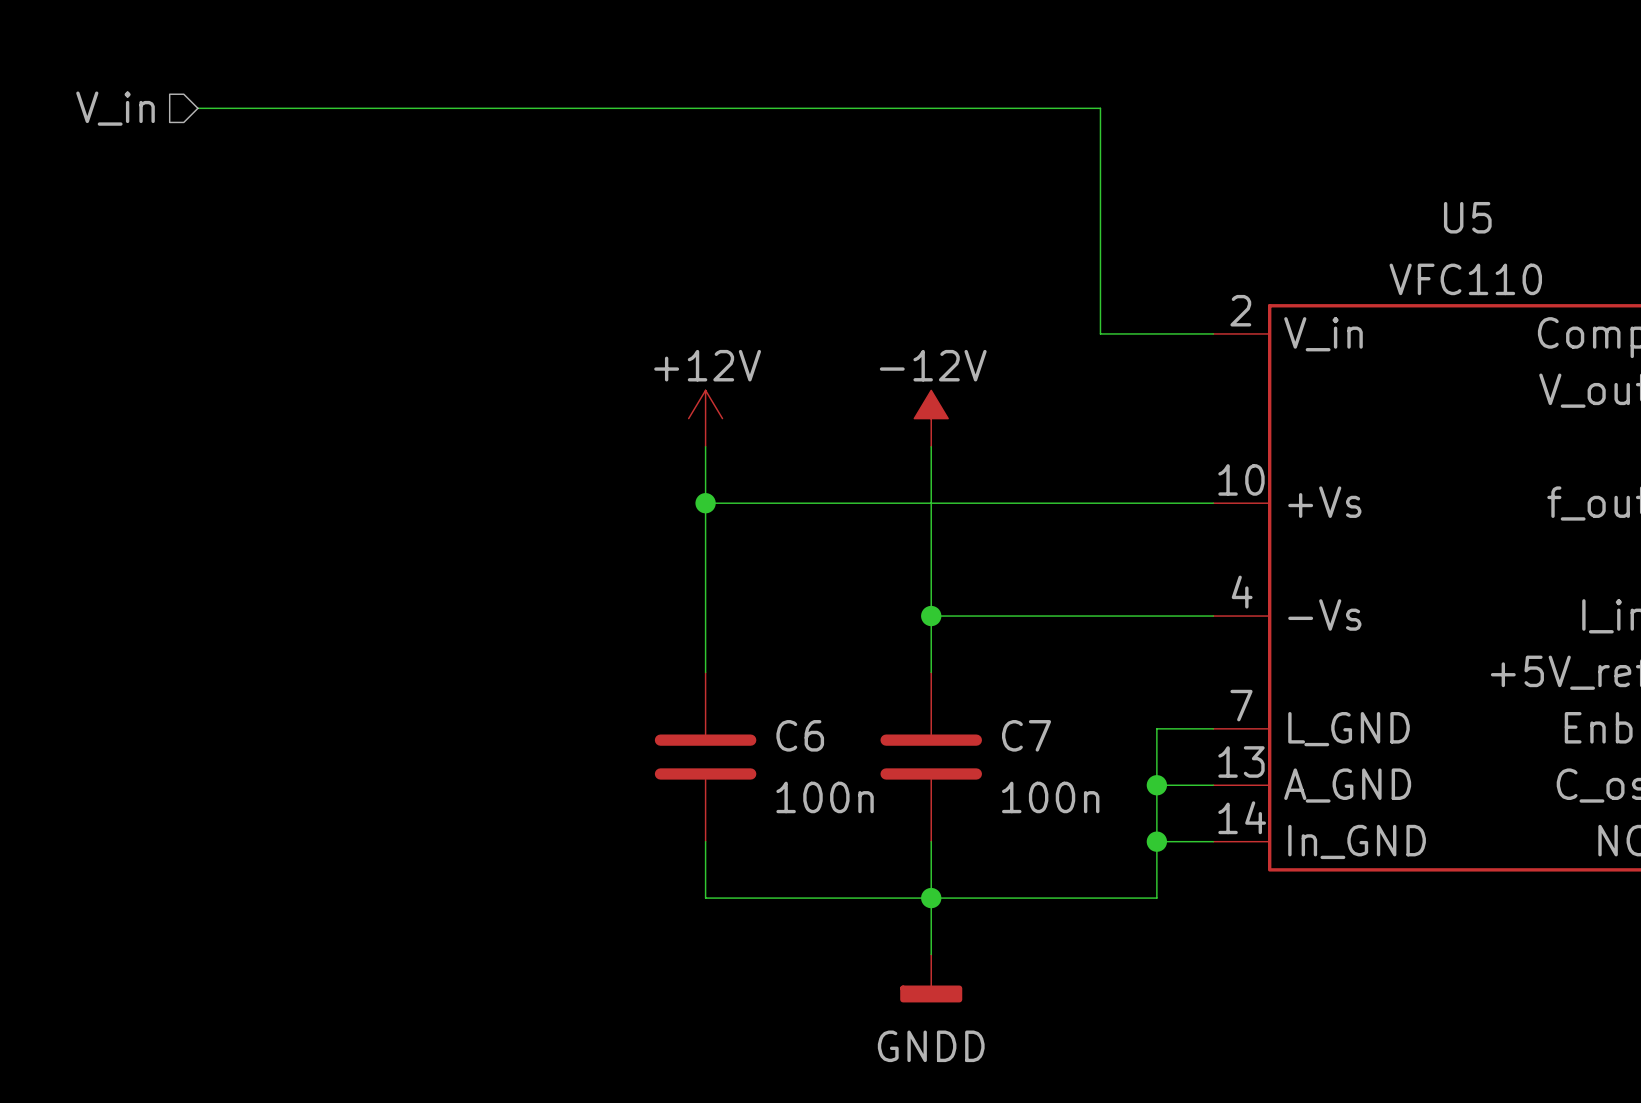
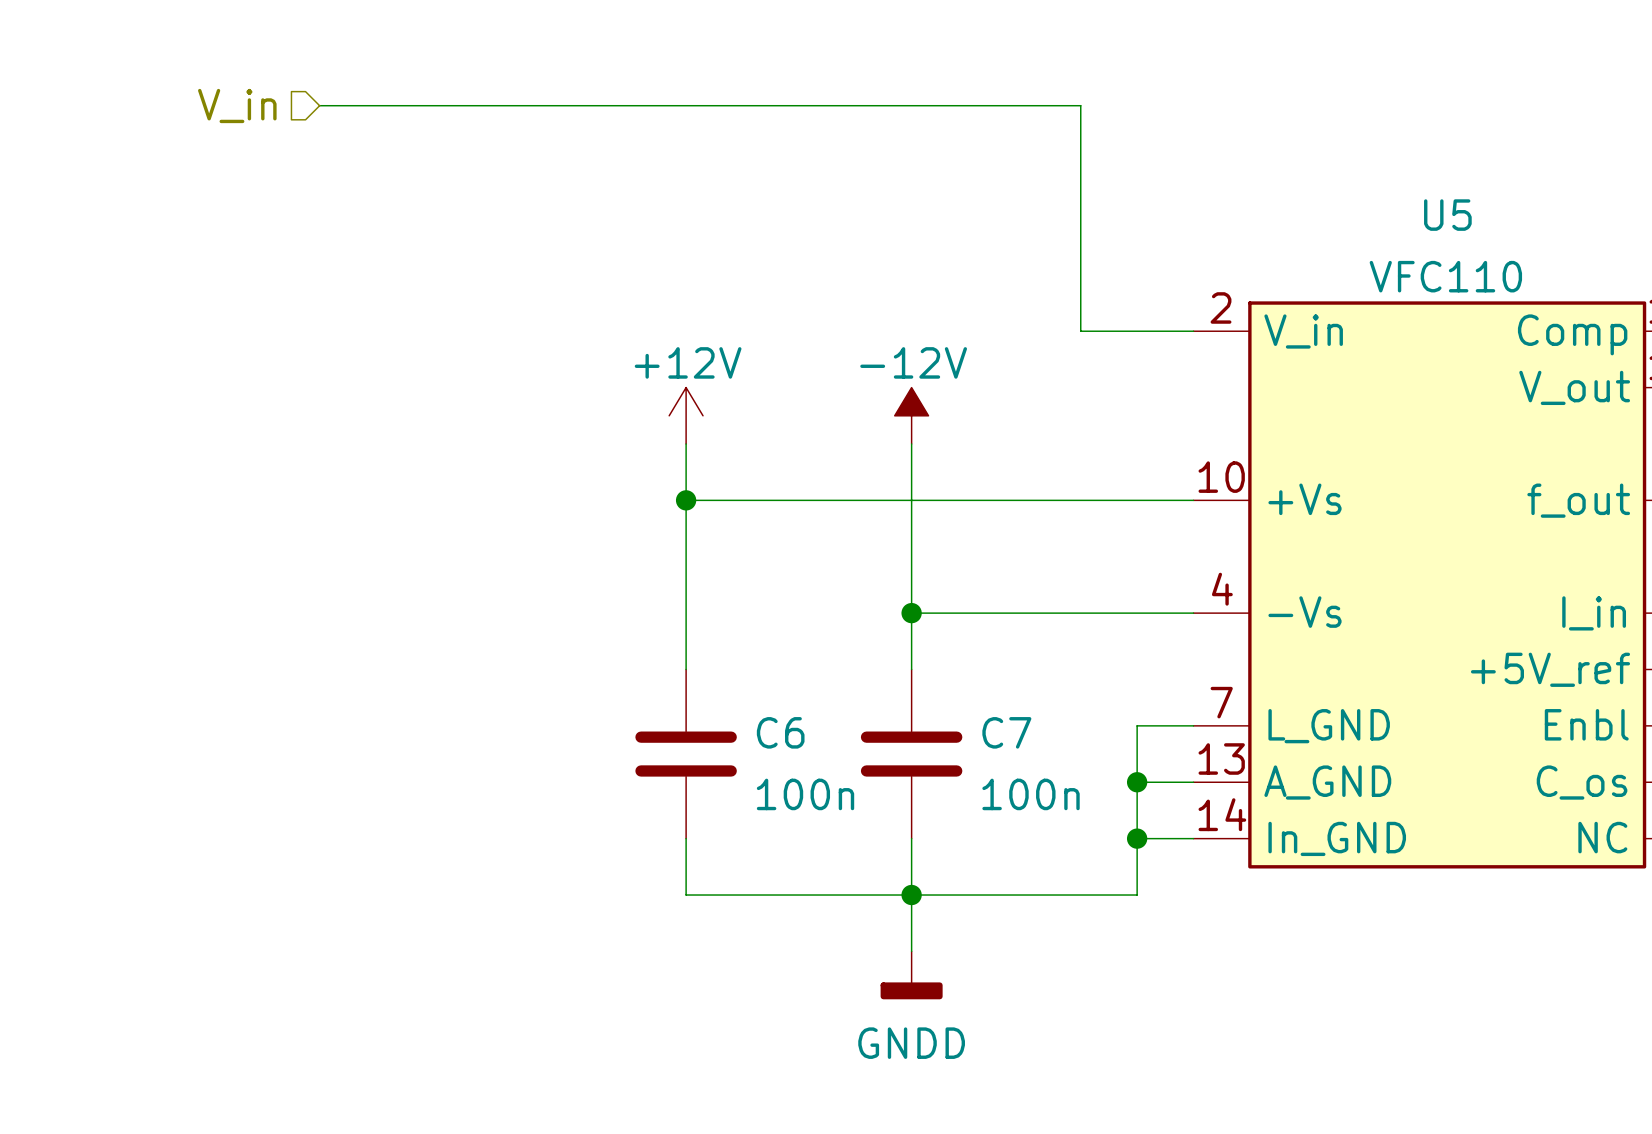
hierarchical label position: V_in (115, 108) -> V_in (237, 106)
wire: (197, 108) (338, 108) -> none

